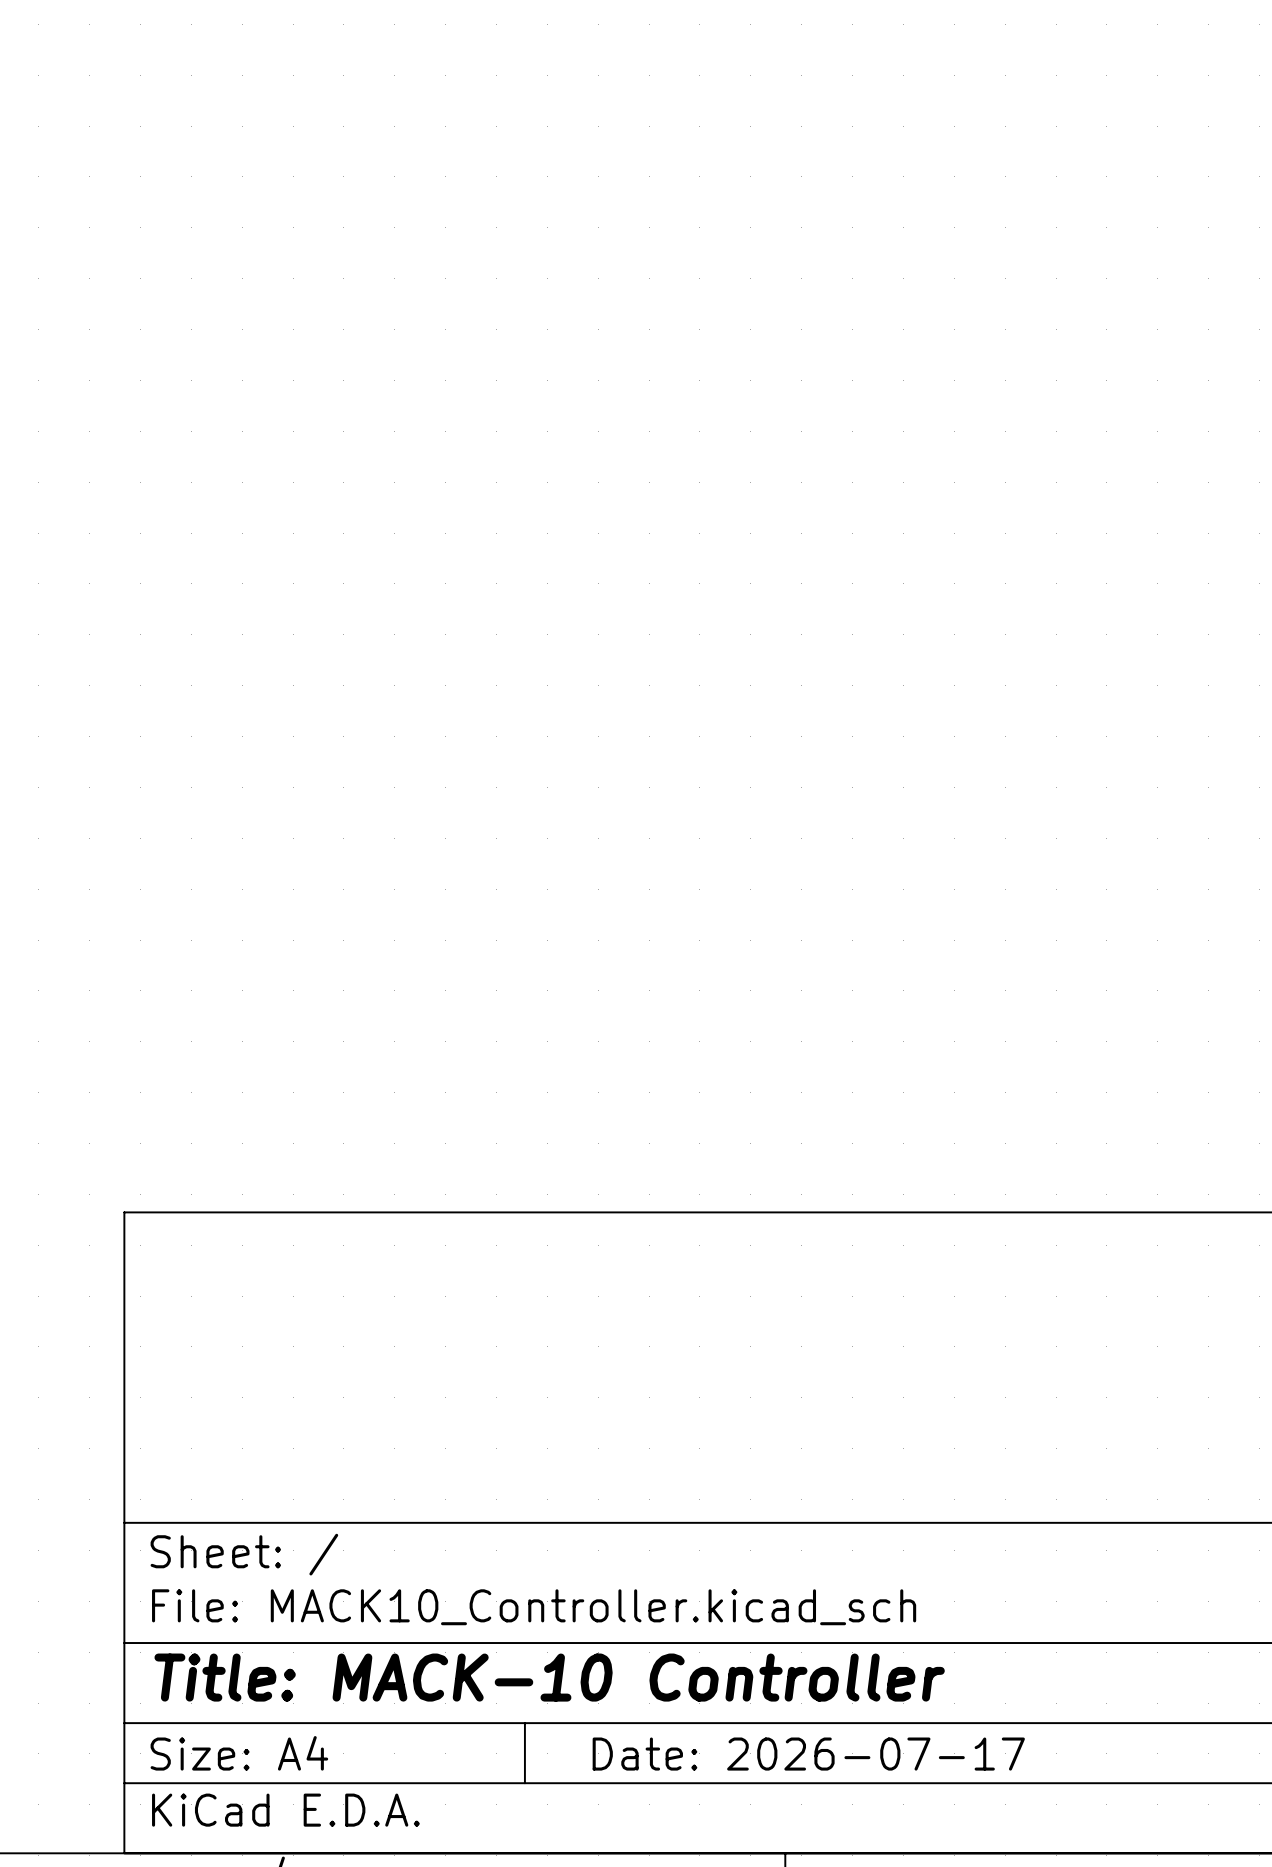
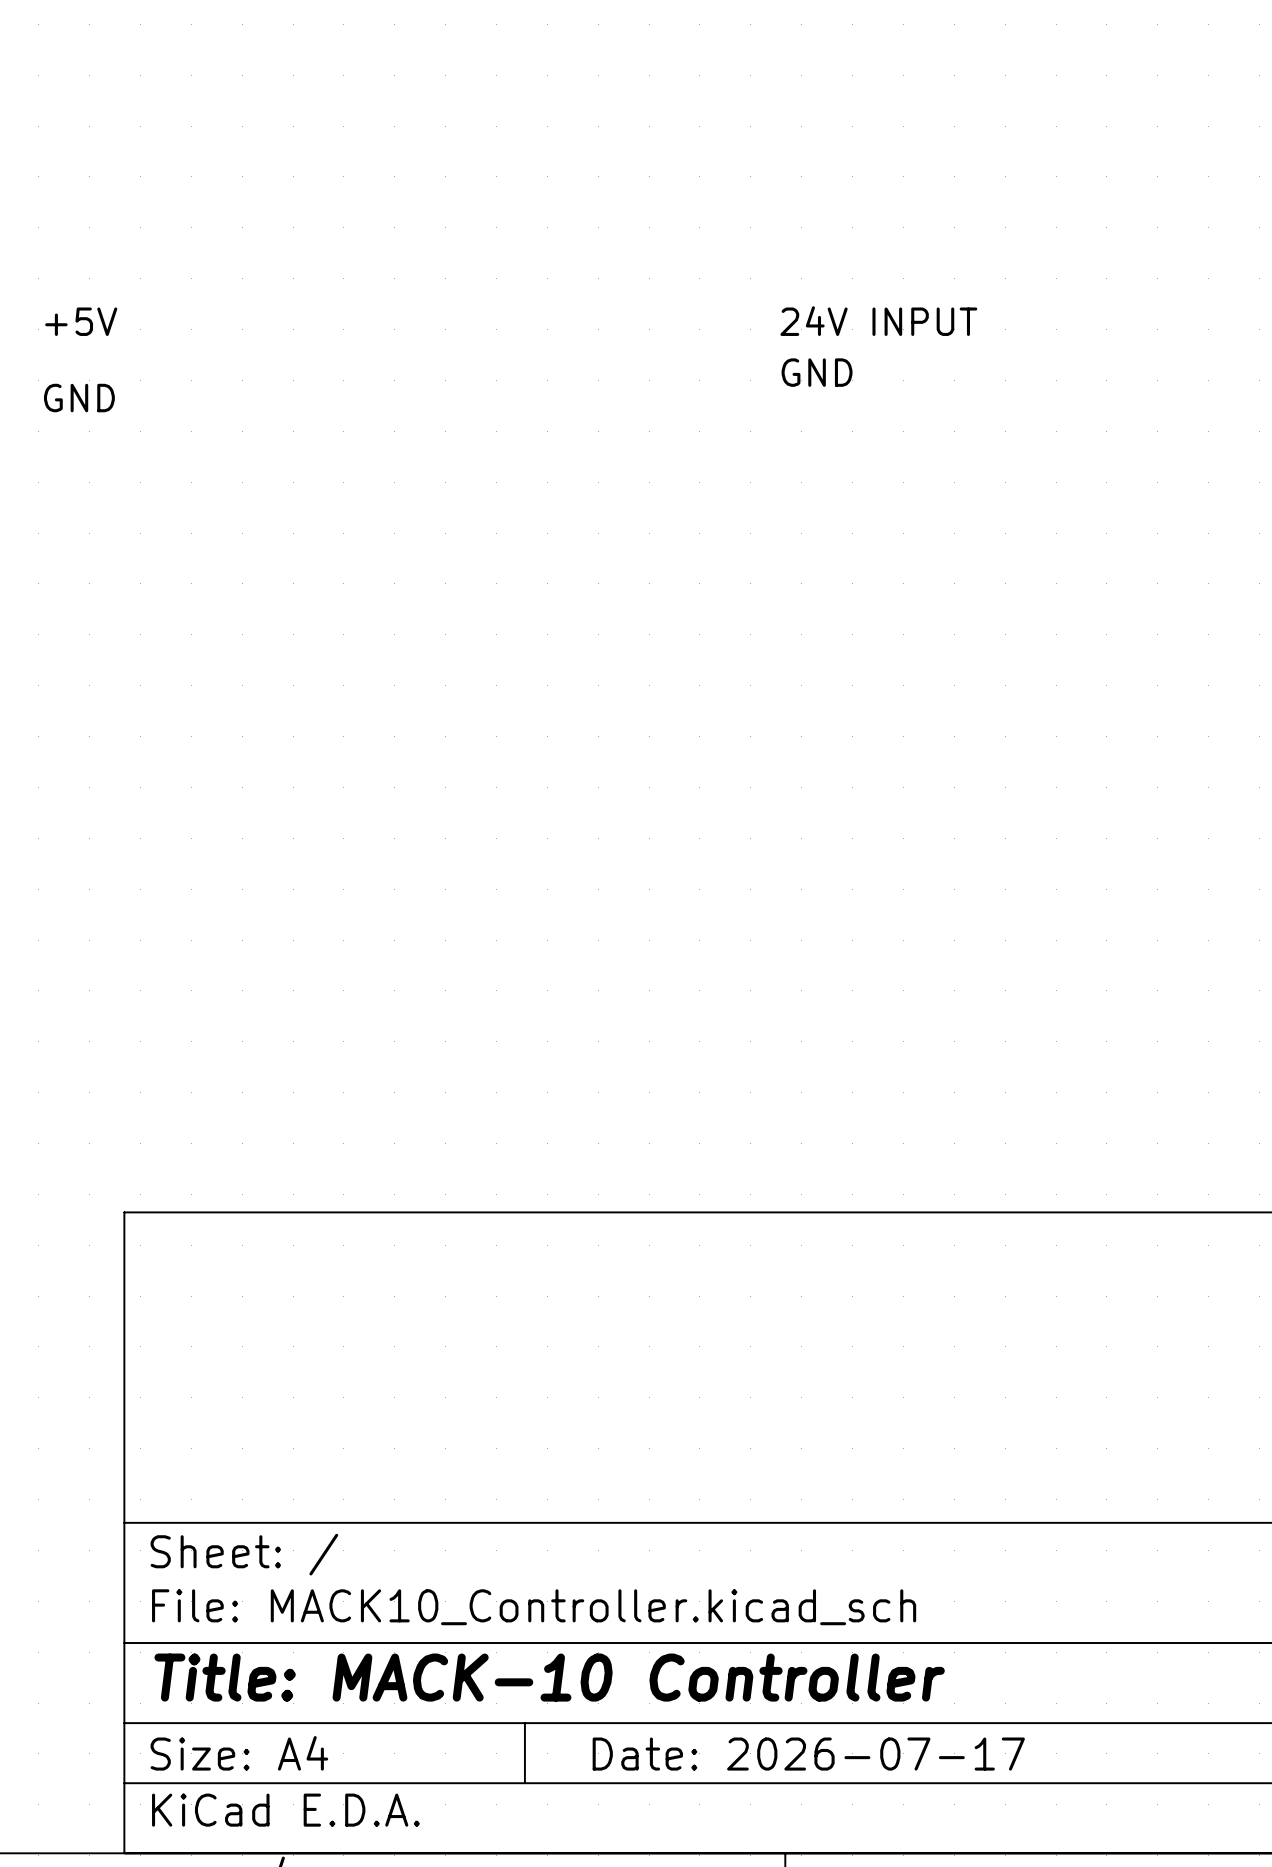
label: none -> +5V (81, 321)
label: none -> 24V INPUT (878, 321)
label: none -> GND (817, 372)
label: none -> GND (79, 398)

